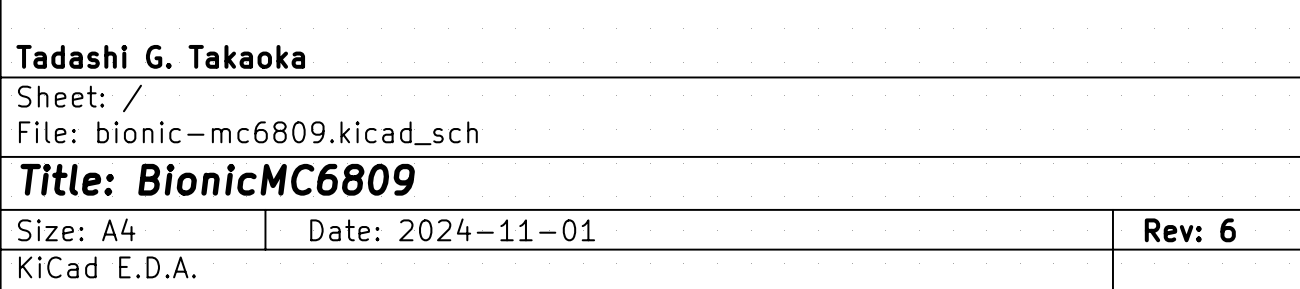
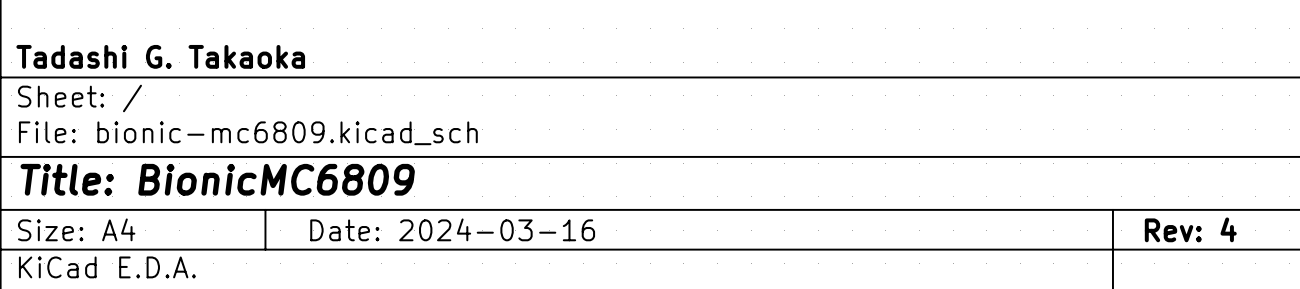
title block: Date: 2024-11-01 (452, 229) -> Date: 2024-03-16 (452, 229)
title block: Rev: 6 (1190, 230) -> Rev: 4 (1190, 229)

